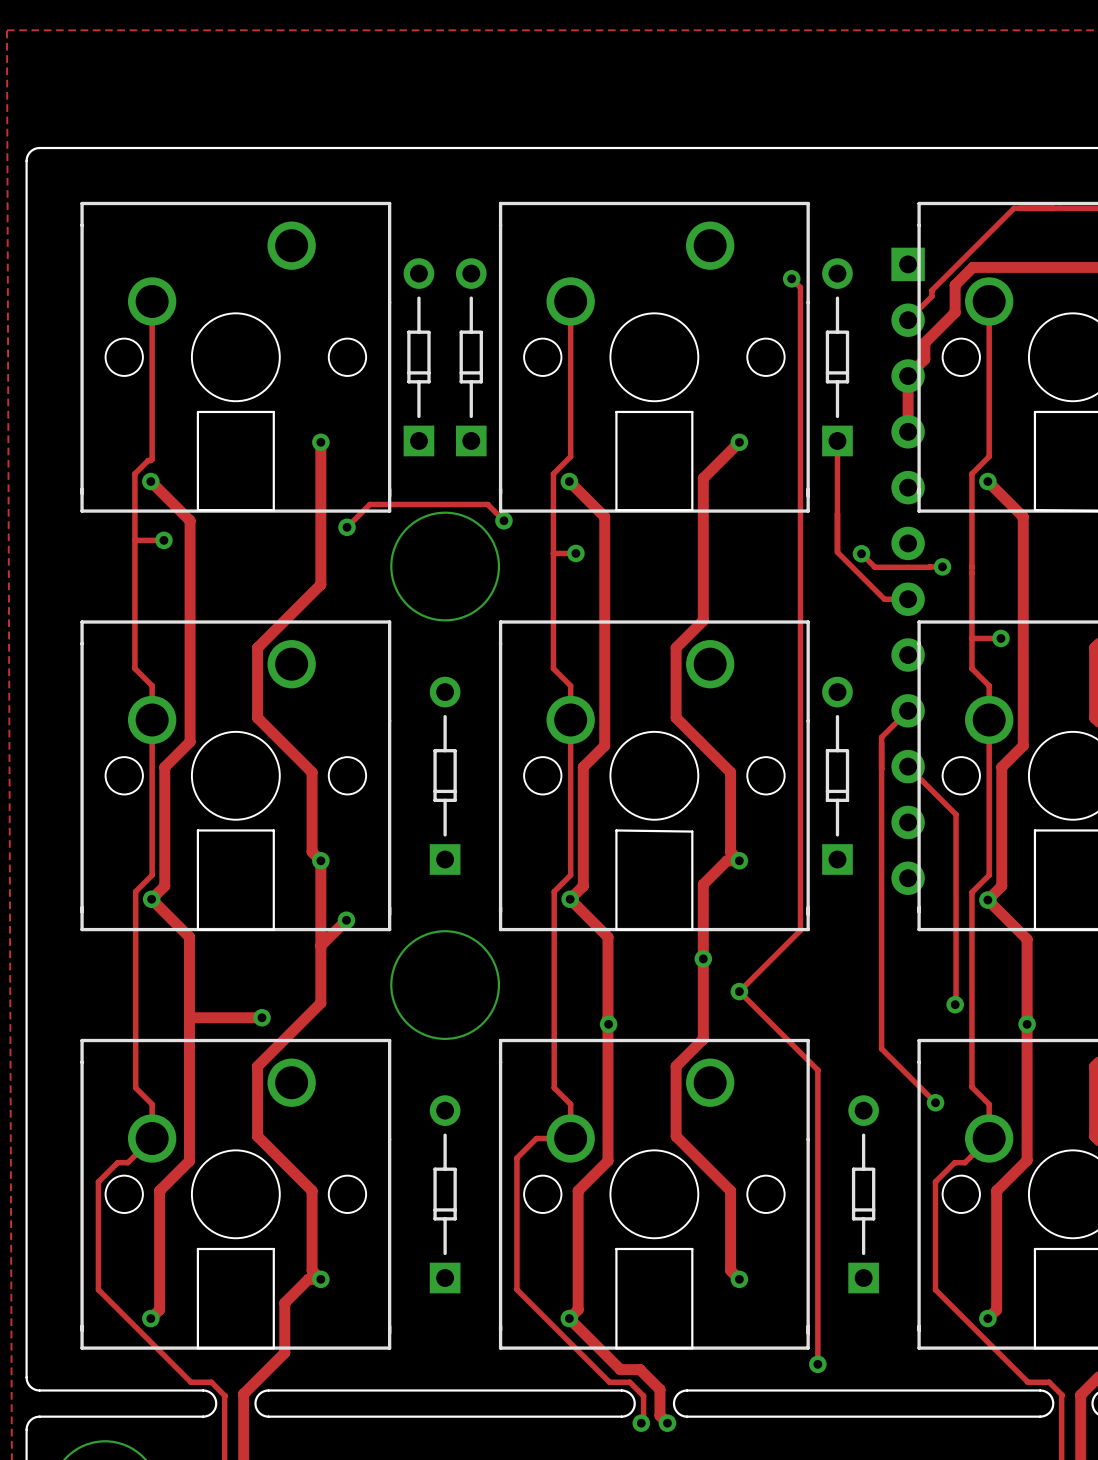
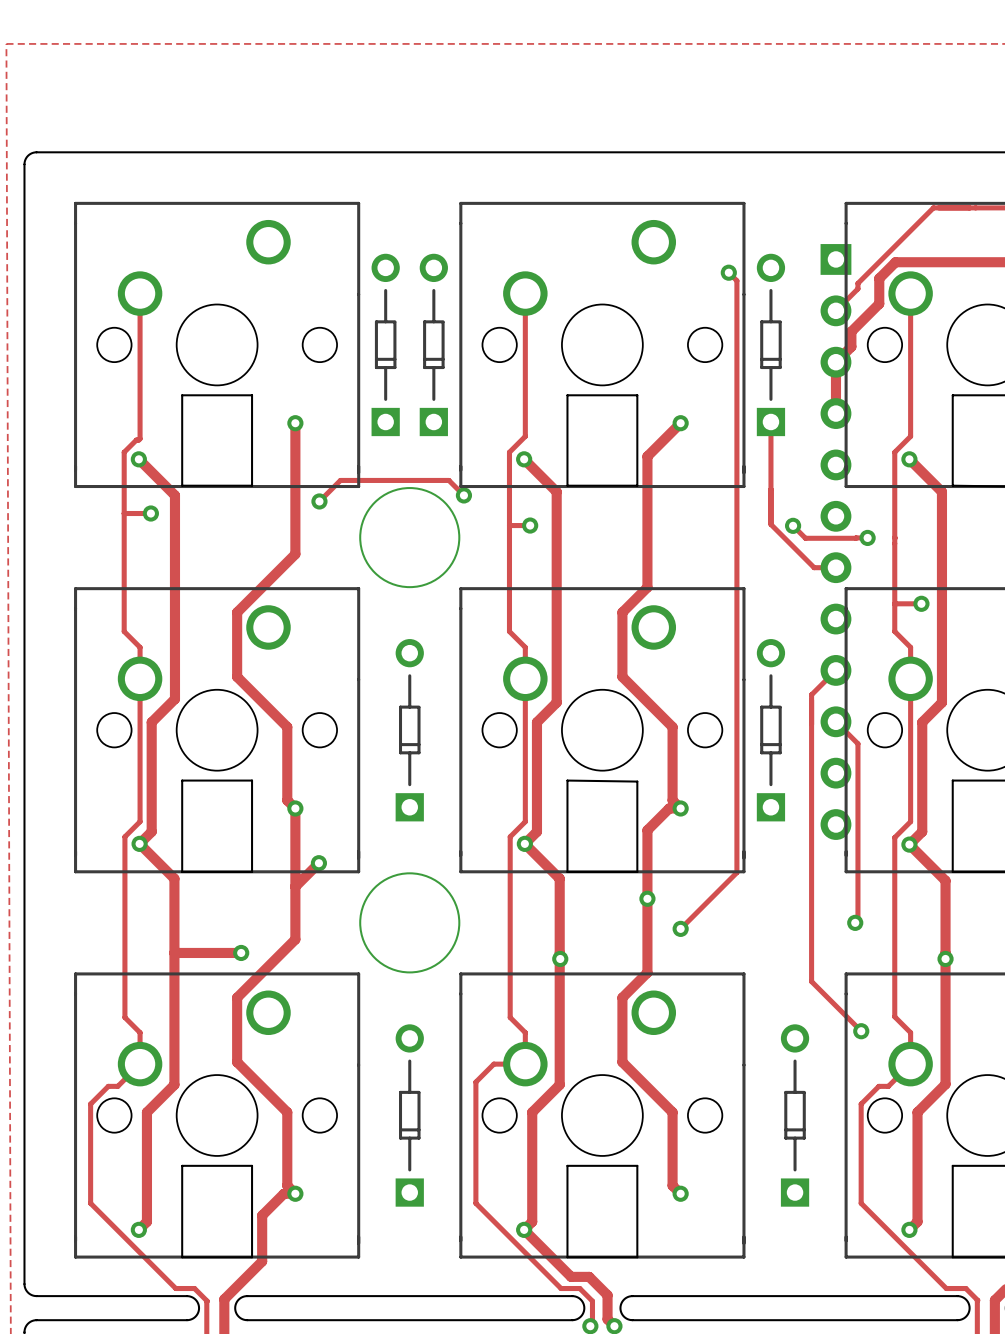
track: (931, 790) (956, 814) (955, 1004) -> (857, 743) (857, 920) (855, 922)
track: (739, 991) (817, 1070) (817, 1364) -> none
via position: (955, 1004) -> (855, 922)
via: (817, 1364) -> none

